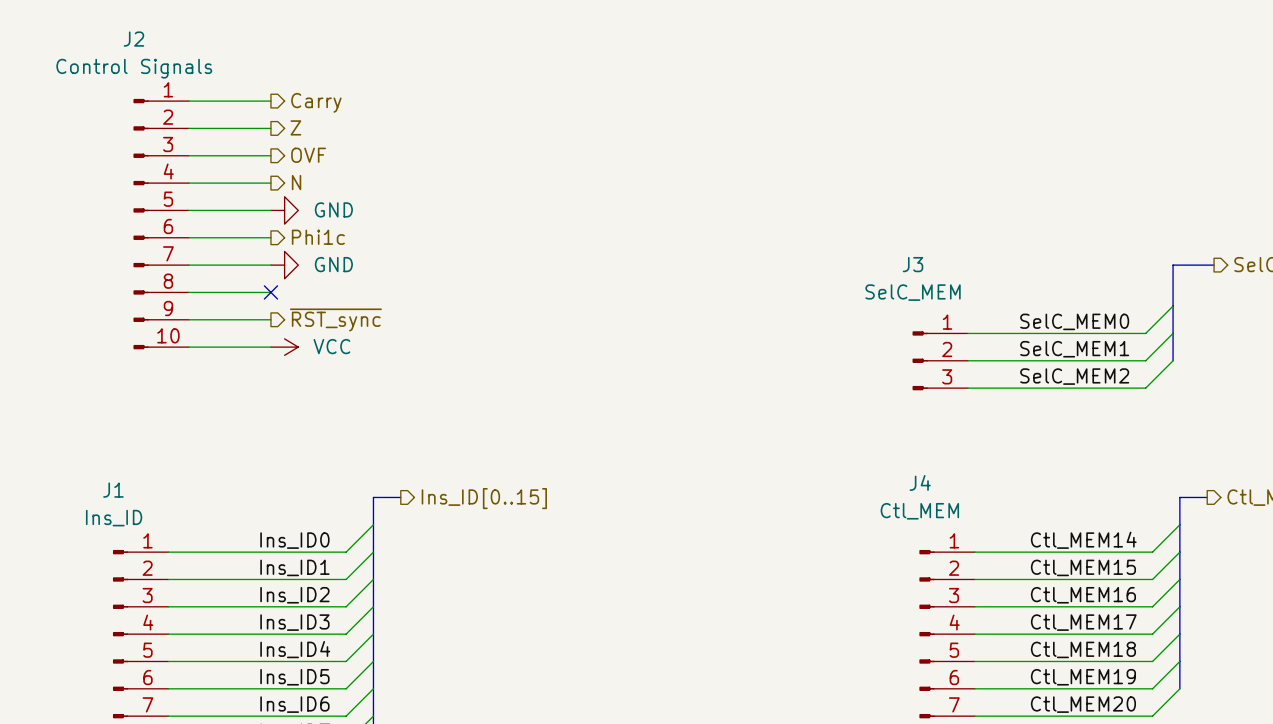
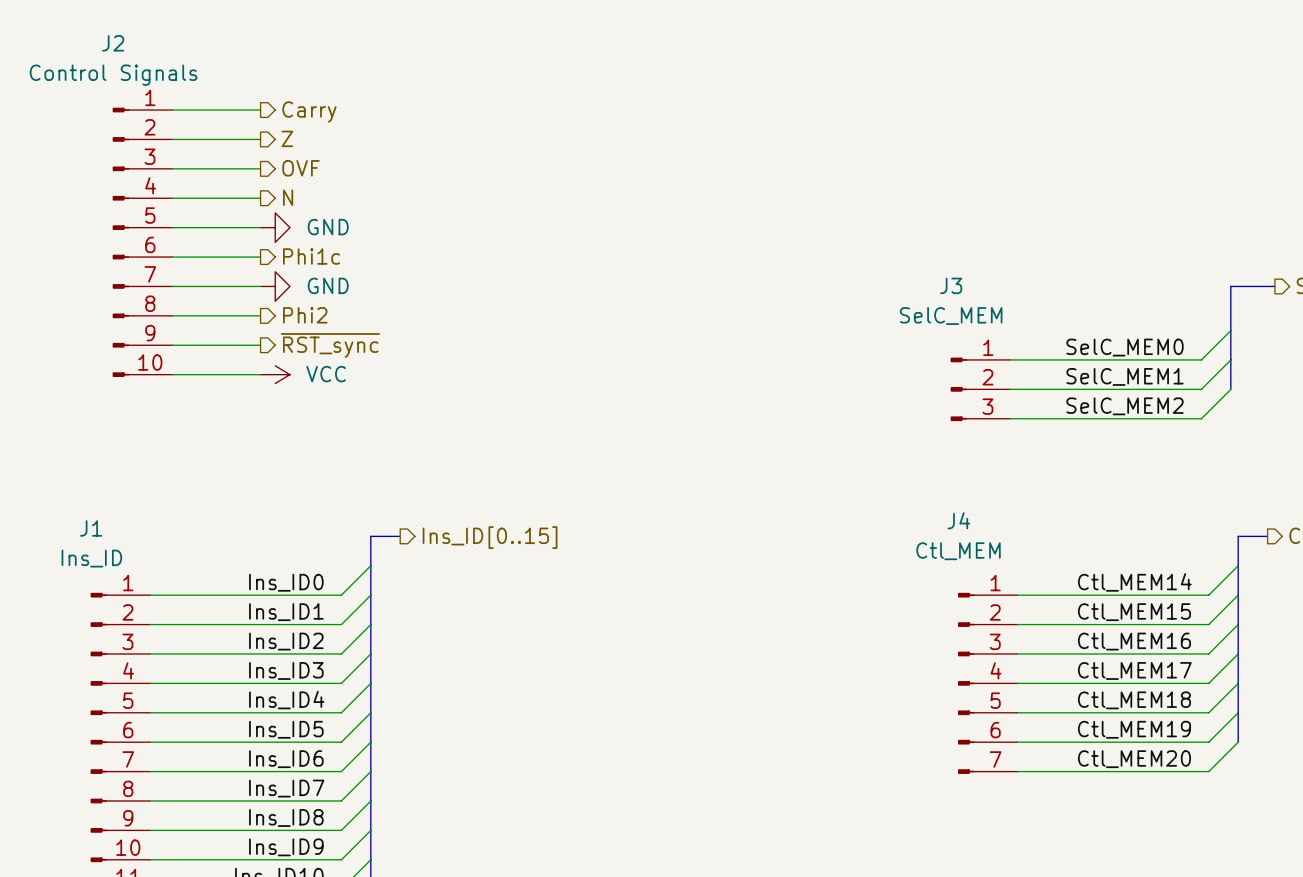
hierarchical label: none -> Phi2 (305, 315)
no-connect mark: (270, 292) -> none

